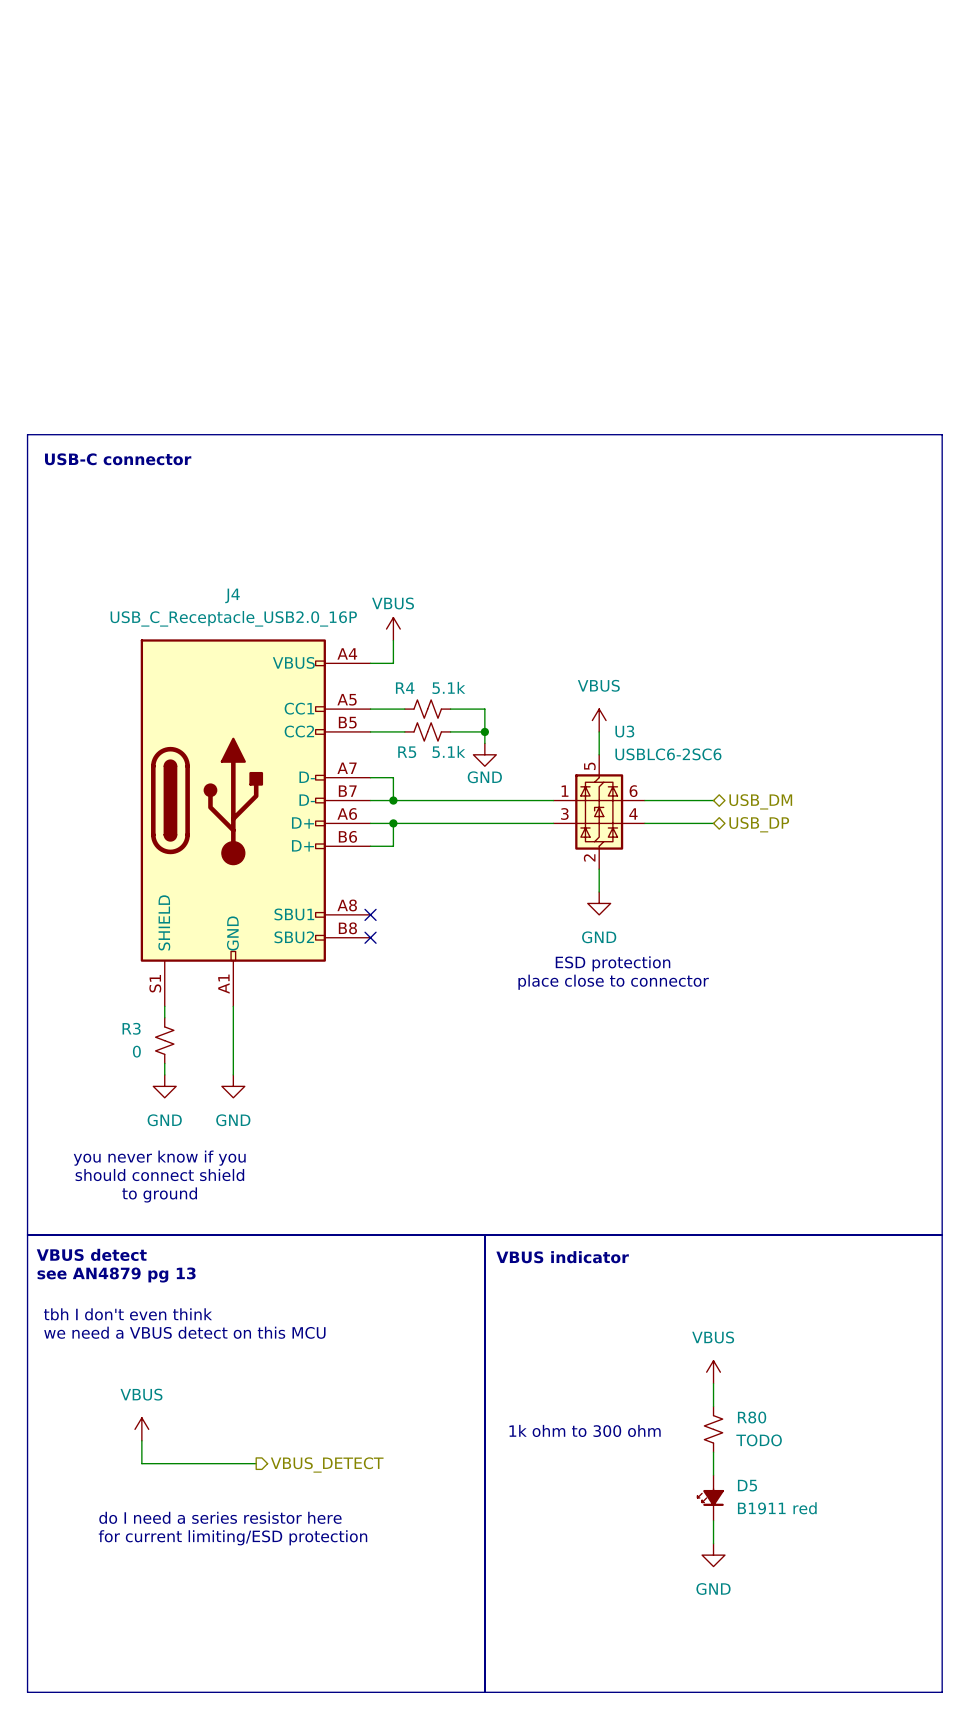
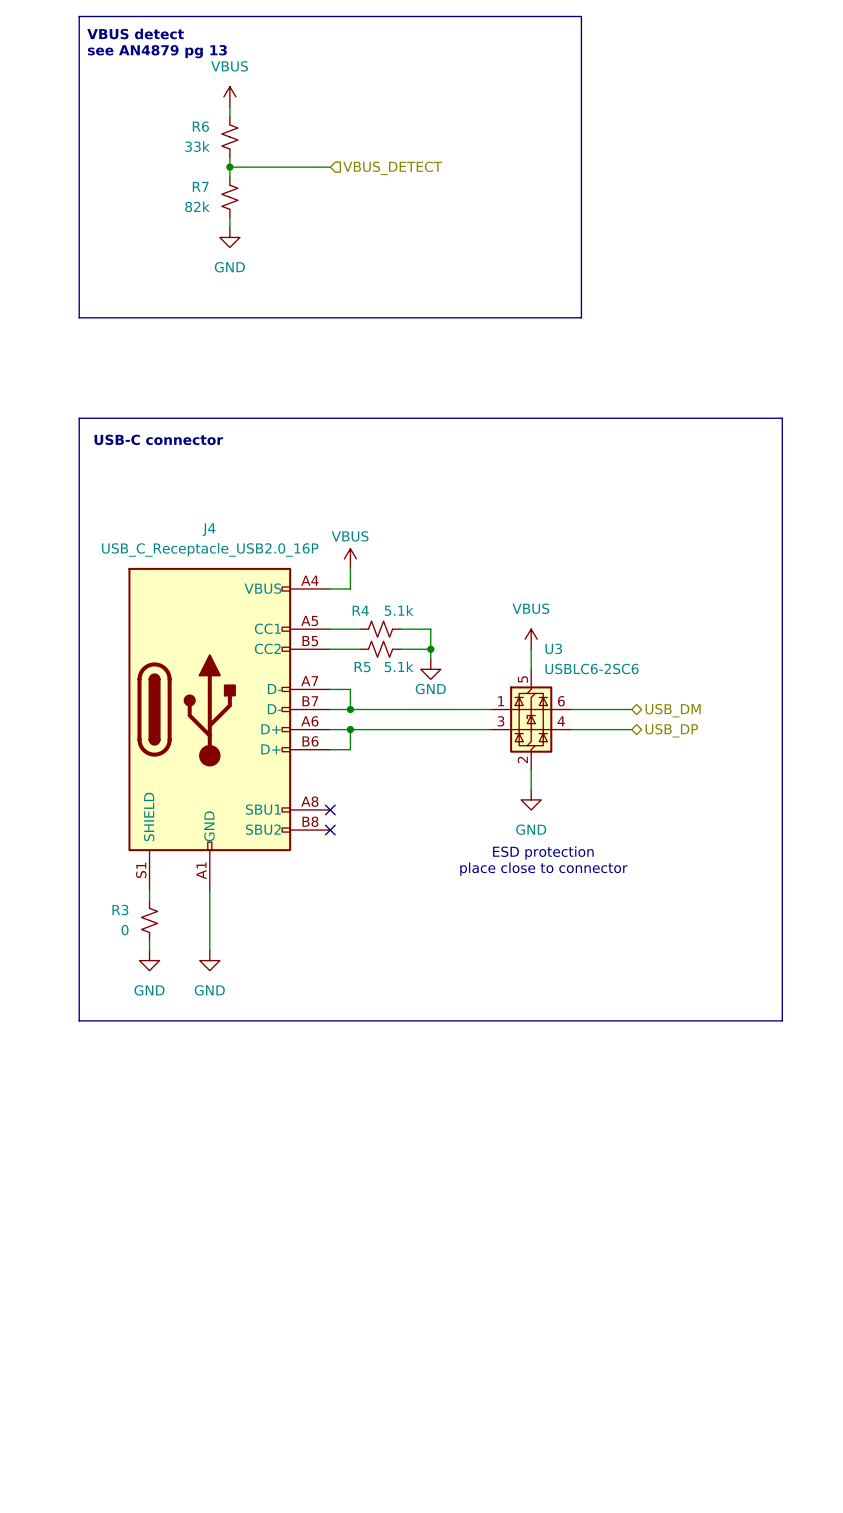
line: none -> (79, 16) (581, 16) (581, 317) (79, 317) (79, 16)
text: none -> VBUS detect (135, 33)
text: none -> see AN4879 pg 13 (157, 51)
power symbol: none -> VBUS (229, 96)
wire: none -> (229, 106) (229, 116)
R6: none -> 33k (229, 137)
wire: none -> (229, 157) (229, 177)
wire: none -> (229, 167) (330, 167)
junction: none -> (229, 167)
hierarchical label: none -> VBUS_DETECT (392, 168)
R7: none -> 82k (229, 197)
wire: none -> (229, 217) (229, 227)
power symbol: none -> GND (229, 237)
line: (27, 434) (27, 1692) (942, 1692) (942, 434) (27, 434) -> none
text position: USB-C connector (118, 459) -> USB-C connector (158, 439)
line: none -> (79, 418) (79, 1020) (782, 1020) (782, 418) (79, 418)
text: you never know if you (159, 1158) -> none
text: should connect shield (159, 1175) -> none
text: to ground (159, 1194) -> none
line: (27, 1235) (942, 1235) -> none
line: (484, 1235) (484, 1692) -> none
text: VBUS detect (91, 1254) -> none
text: VBUS indicator (562, 1257) -> none
text: see AN4879 pg 13 (116, 1275) -> none
text: tbh I don't even think (128, 1314) -> none
text: we need a VBUS detect on this MCU (184, 1332) -> none
power symbol: VBUS (713, 1372) -> none
wire: (713, 1383) (713, 1406) -> none
power symbol: VBUS (141, 1429) -> none
R80: TODO (713, 1429) -> none
text: 1k ohm to 300 ohm (585, 1430) -> none
wire: (141, 1440) (141, 1463) (256, 1463) -> none
wire: (713, 1452) (713, 1475) -> none
hierarchical label: VBUS_DETECT (327, 1464) -> none
D5: B1911 red (710, 1497) -> none
text: do I need a series resistor here (220, 1517) -> none
wire: (713, 1520) (713, 1543) -> none
text: for current limiting/ESD protection (233, 1537) -> none
power symbol: GND (713, 1555) -> none

